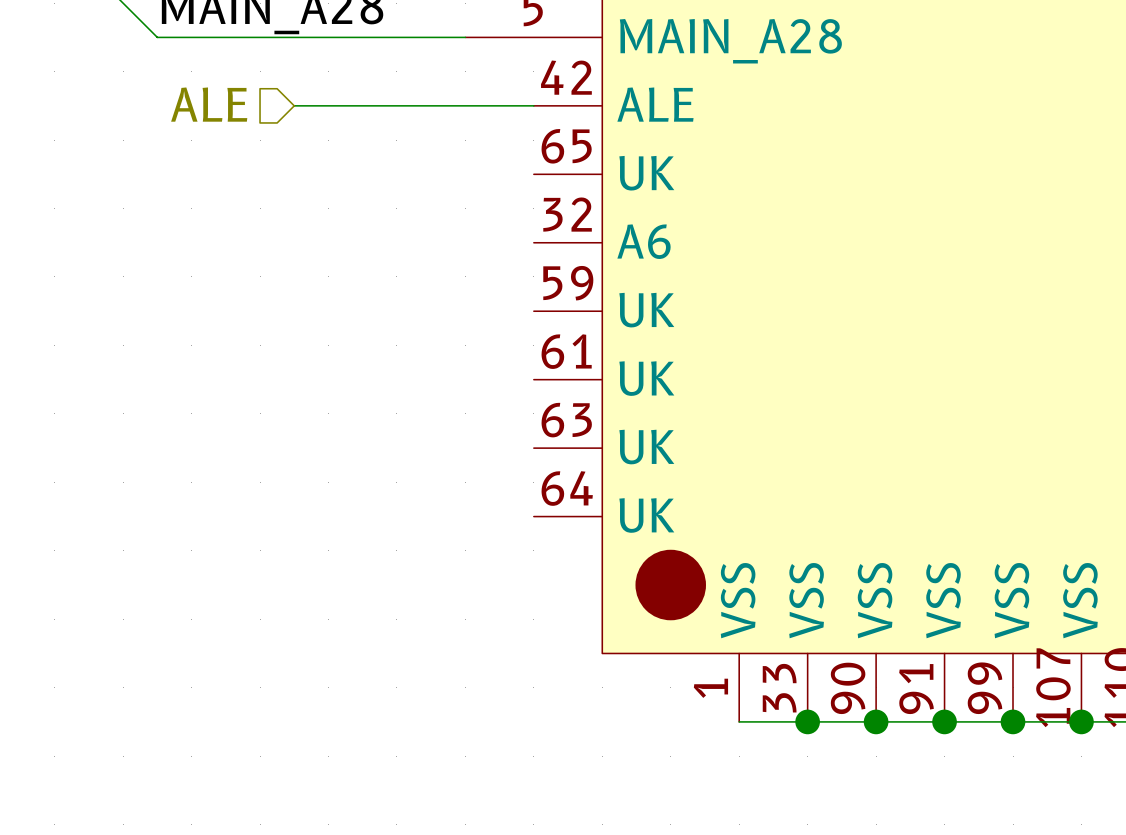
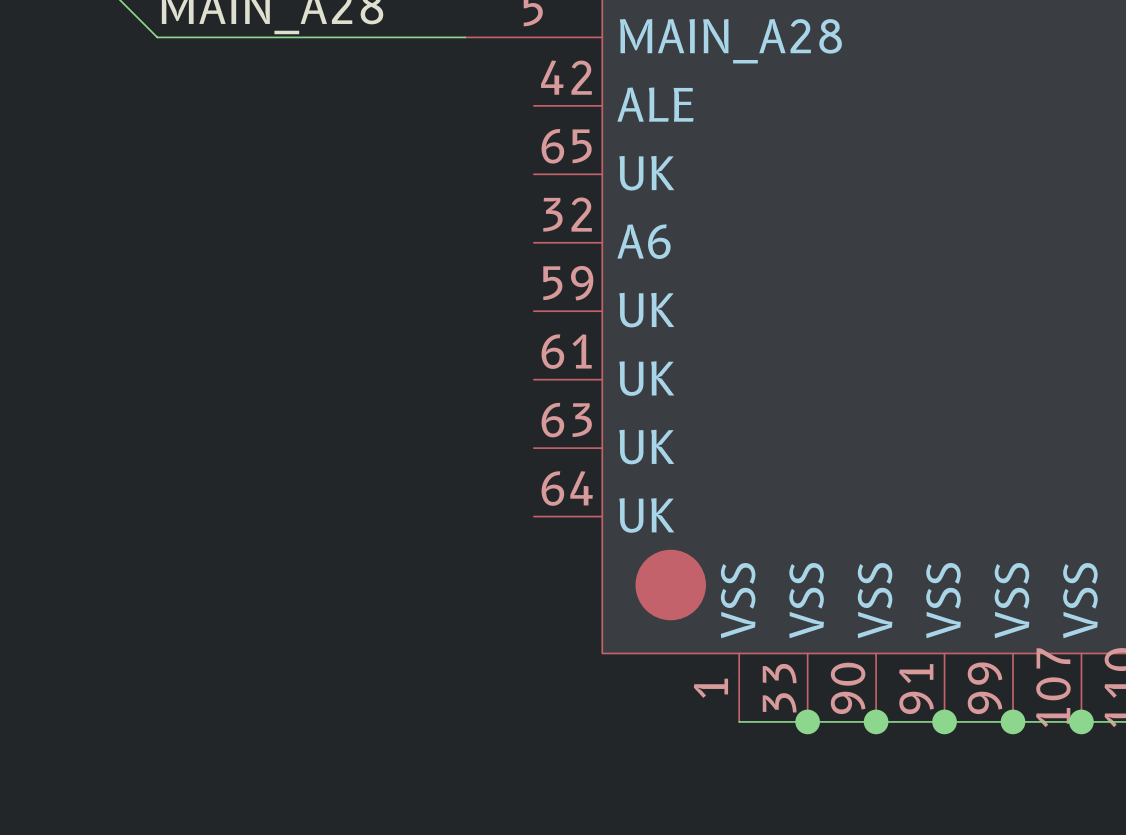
hierarchical label: ALE (209, 104) -> none
wire: (294, 105) (533, 105) -> none

